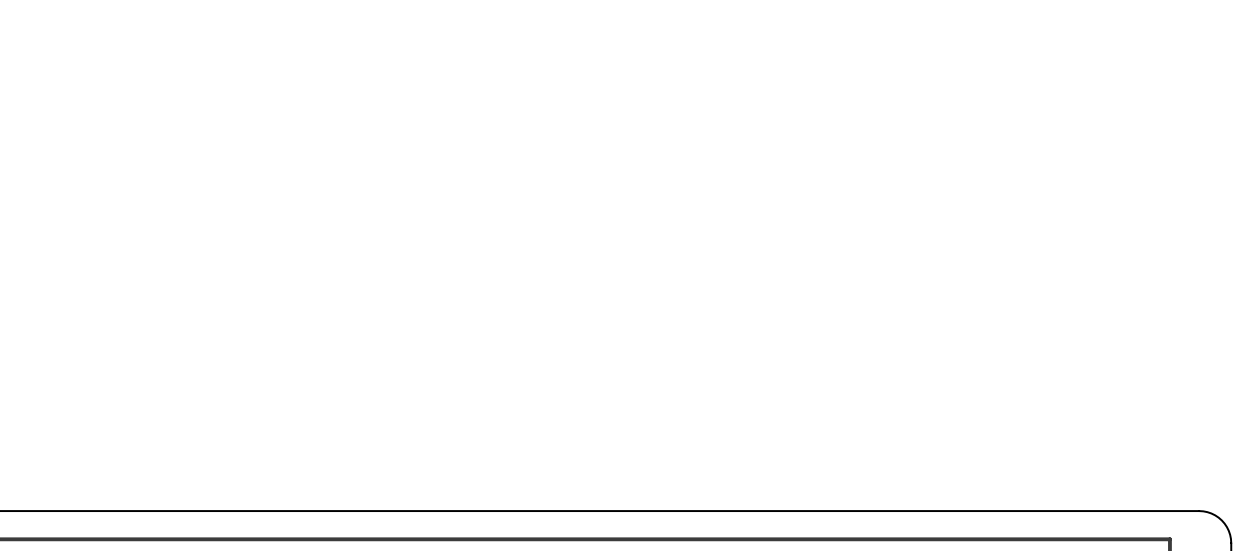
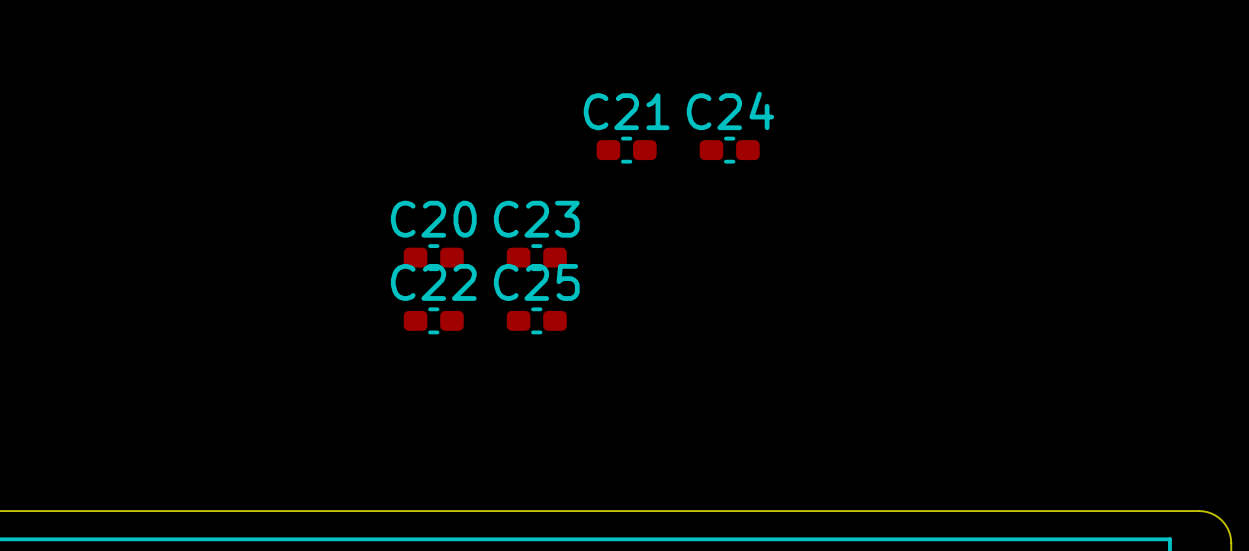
C21: none -> (626, 150)
C24: none -> (729, 150)
C20: none -> (433, 257)
C23: none -> (536, 257)
C22: none -> (433, 320)
C25: none -> (536, 320)

